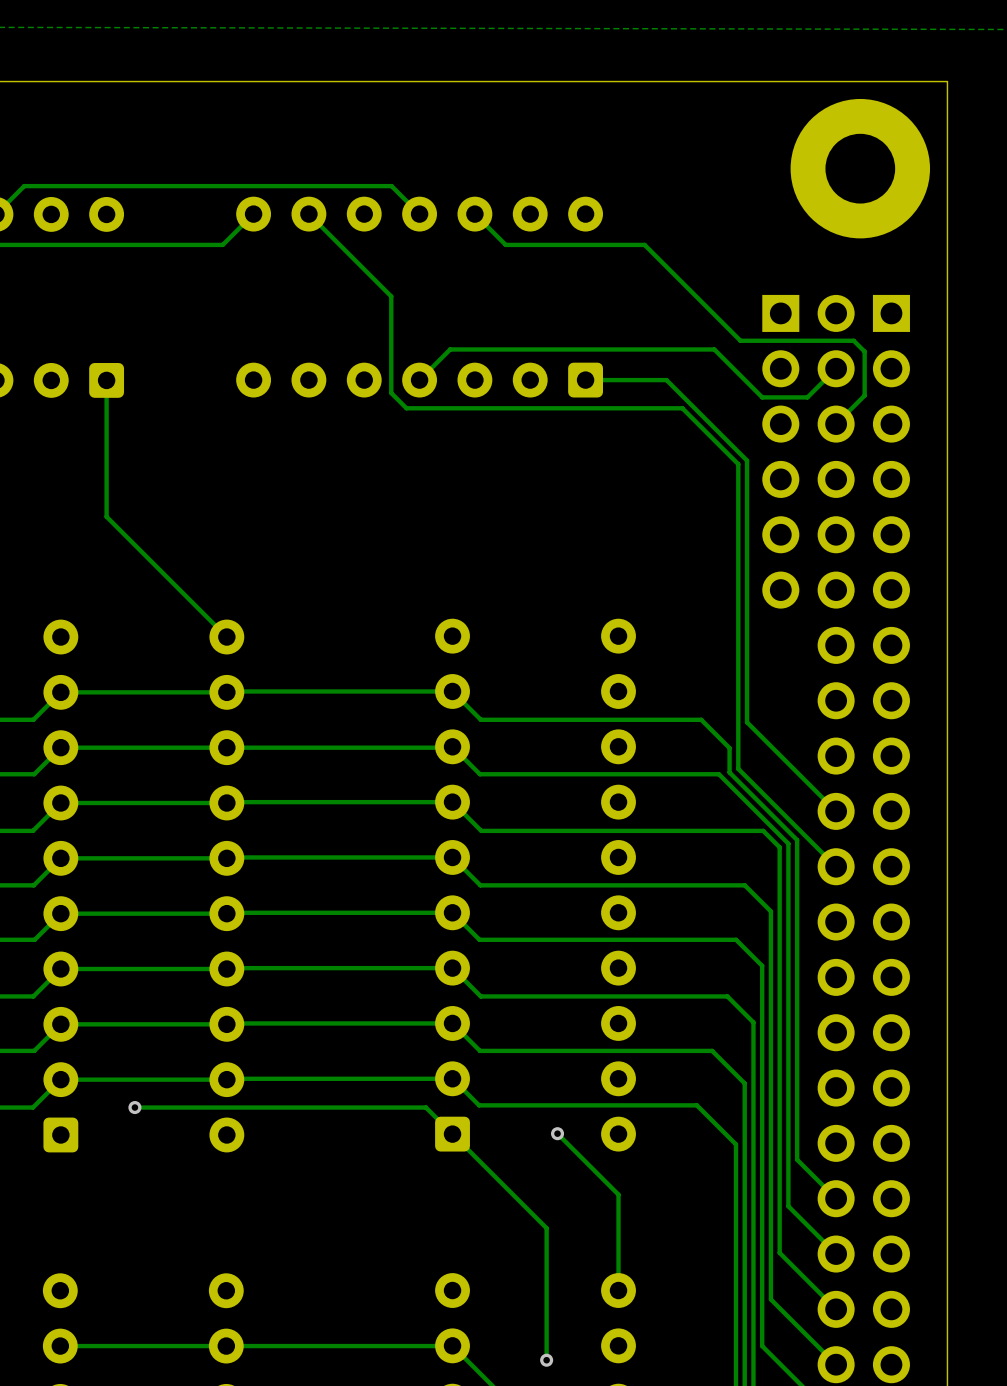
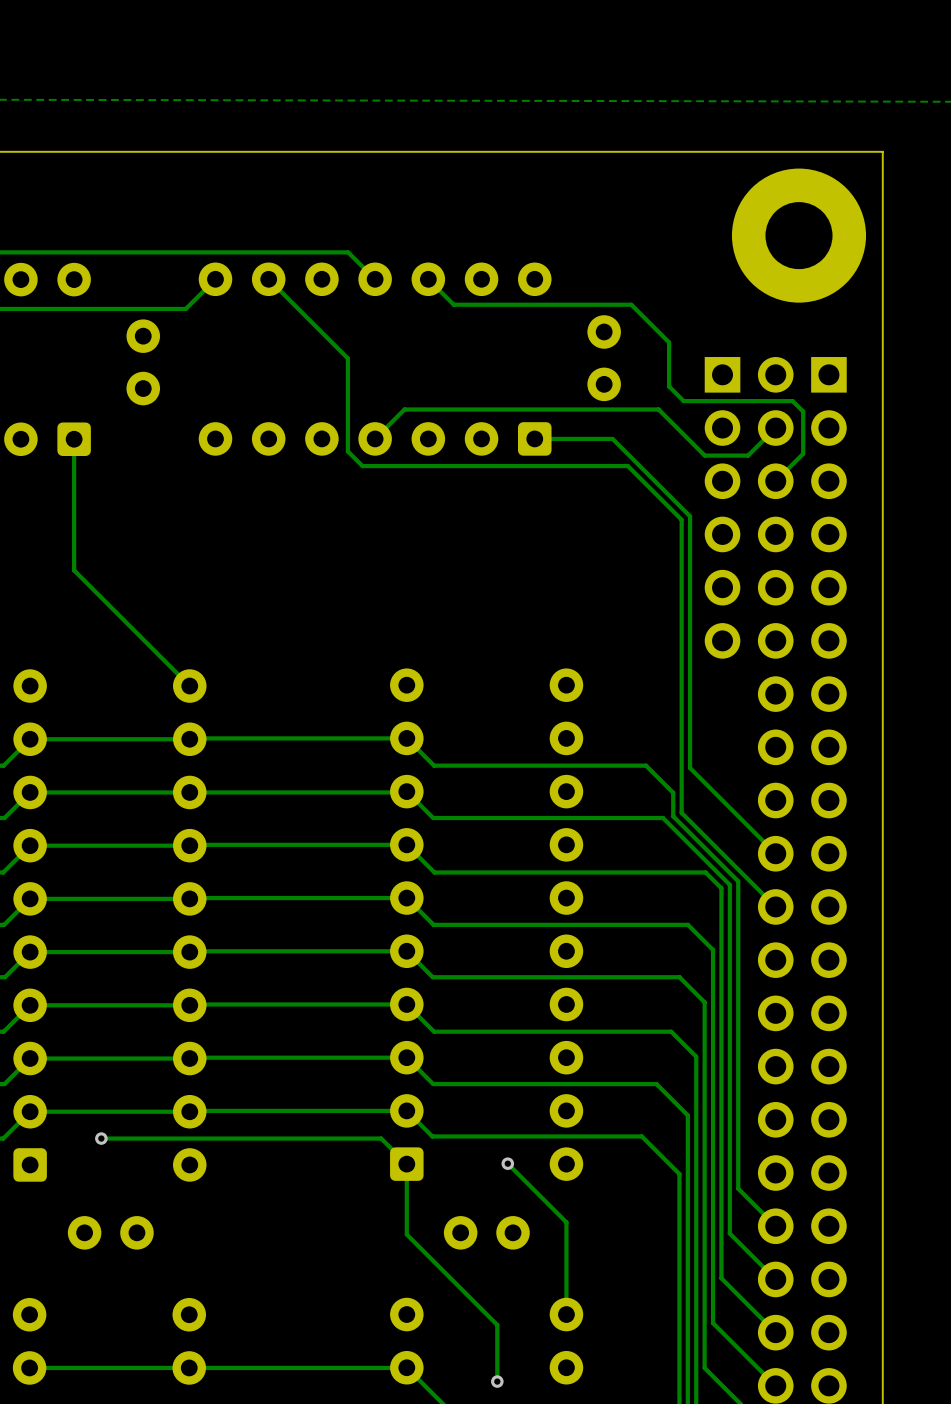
track: (501, 240) (505, 244) (644, 244) (725, 325) -> (453, 304) (631, 304) (669, 342) (669, 386)
part: none -> (604, 358)
part: none -> (143, 362)
track: (452, 1134) (546, 1228) (546, 1301) -> (406, 1164) (406, 1234) (497, 1325)
part: none -> (110, 1232)
part: none -> (486, 1232)

